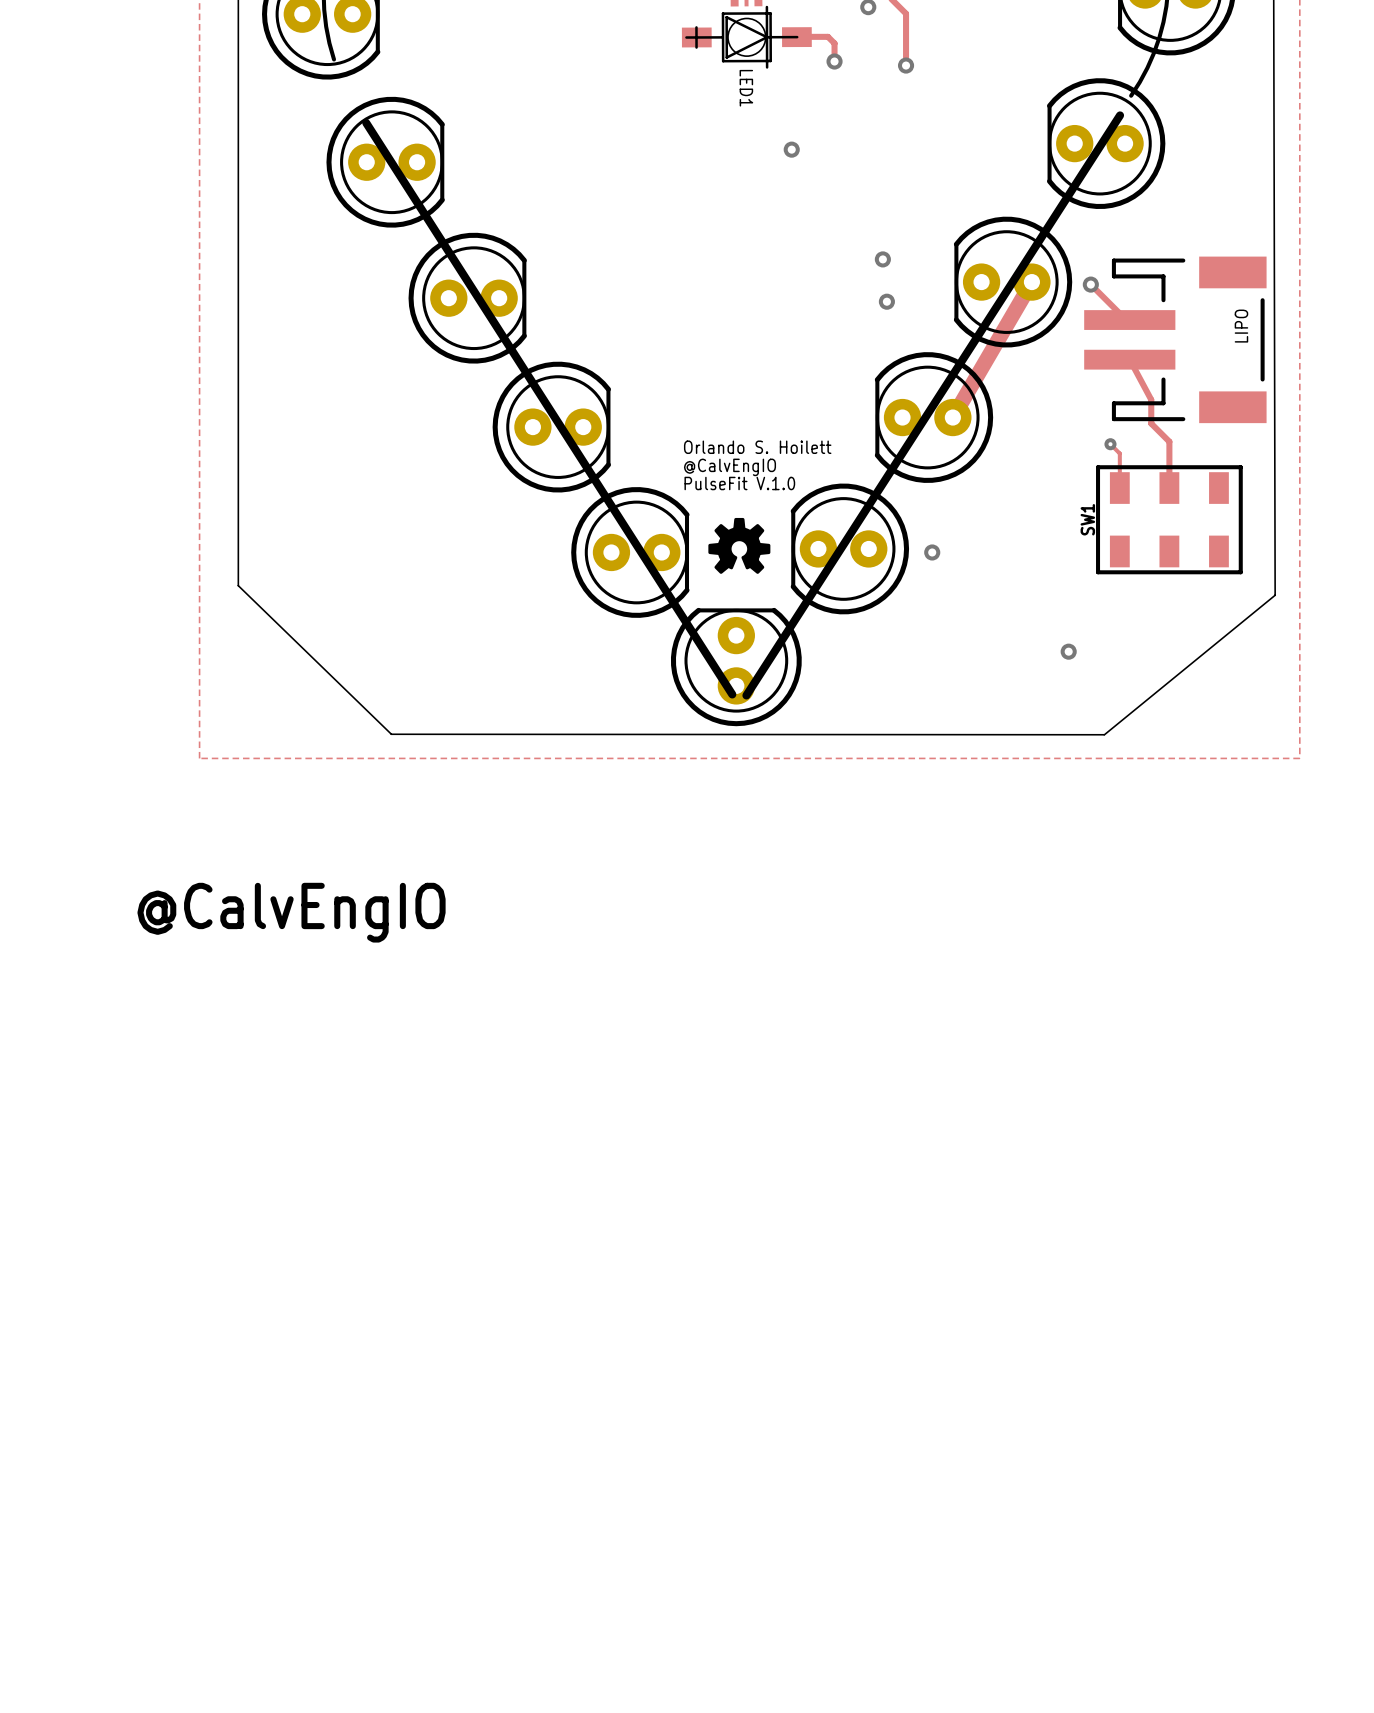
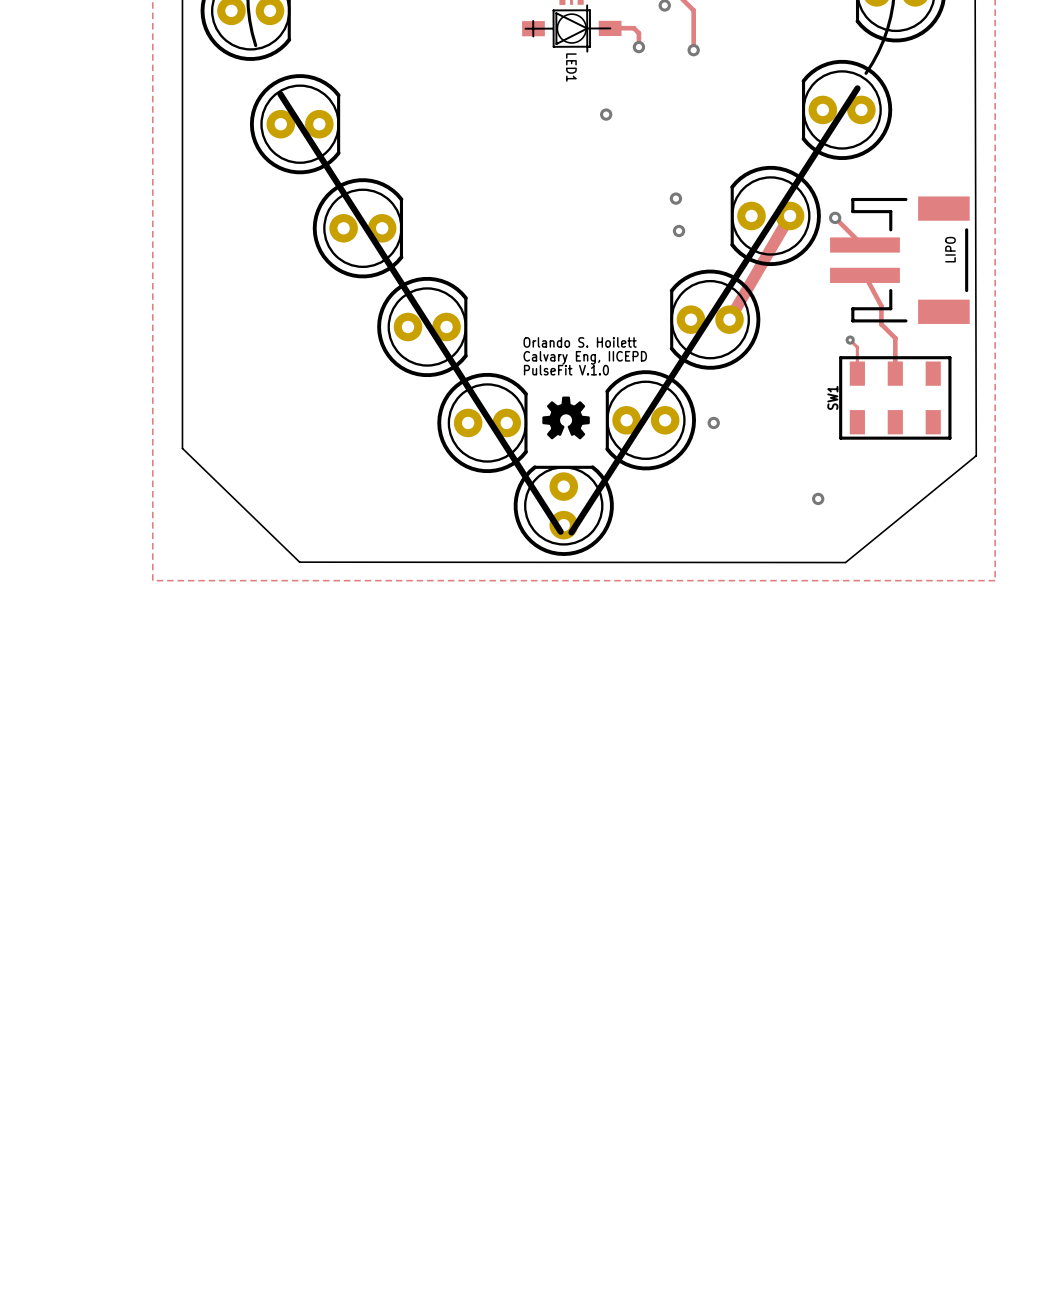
text: @CalvEngIO (729, 467) -> Calvary Eng, IICEPD (585, 357)
drawing: [137, 882, 446, 943] -> none

